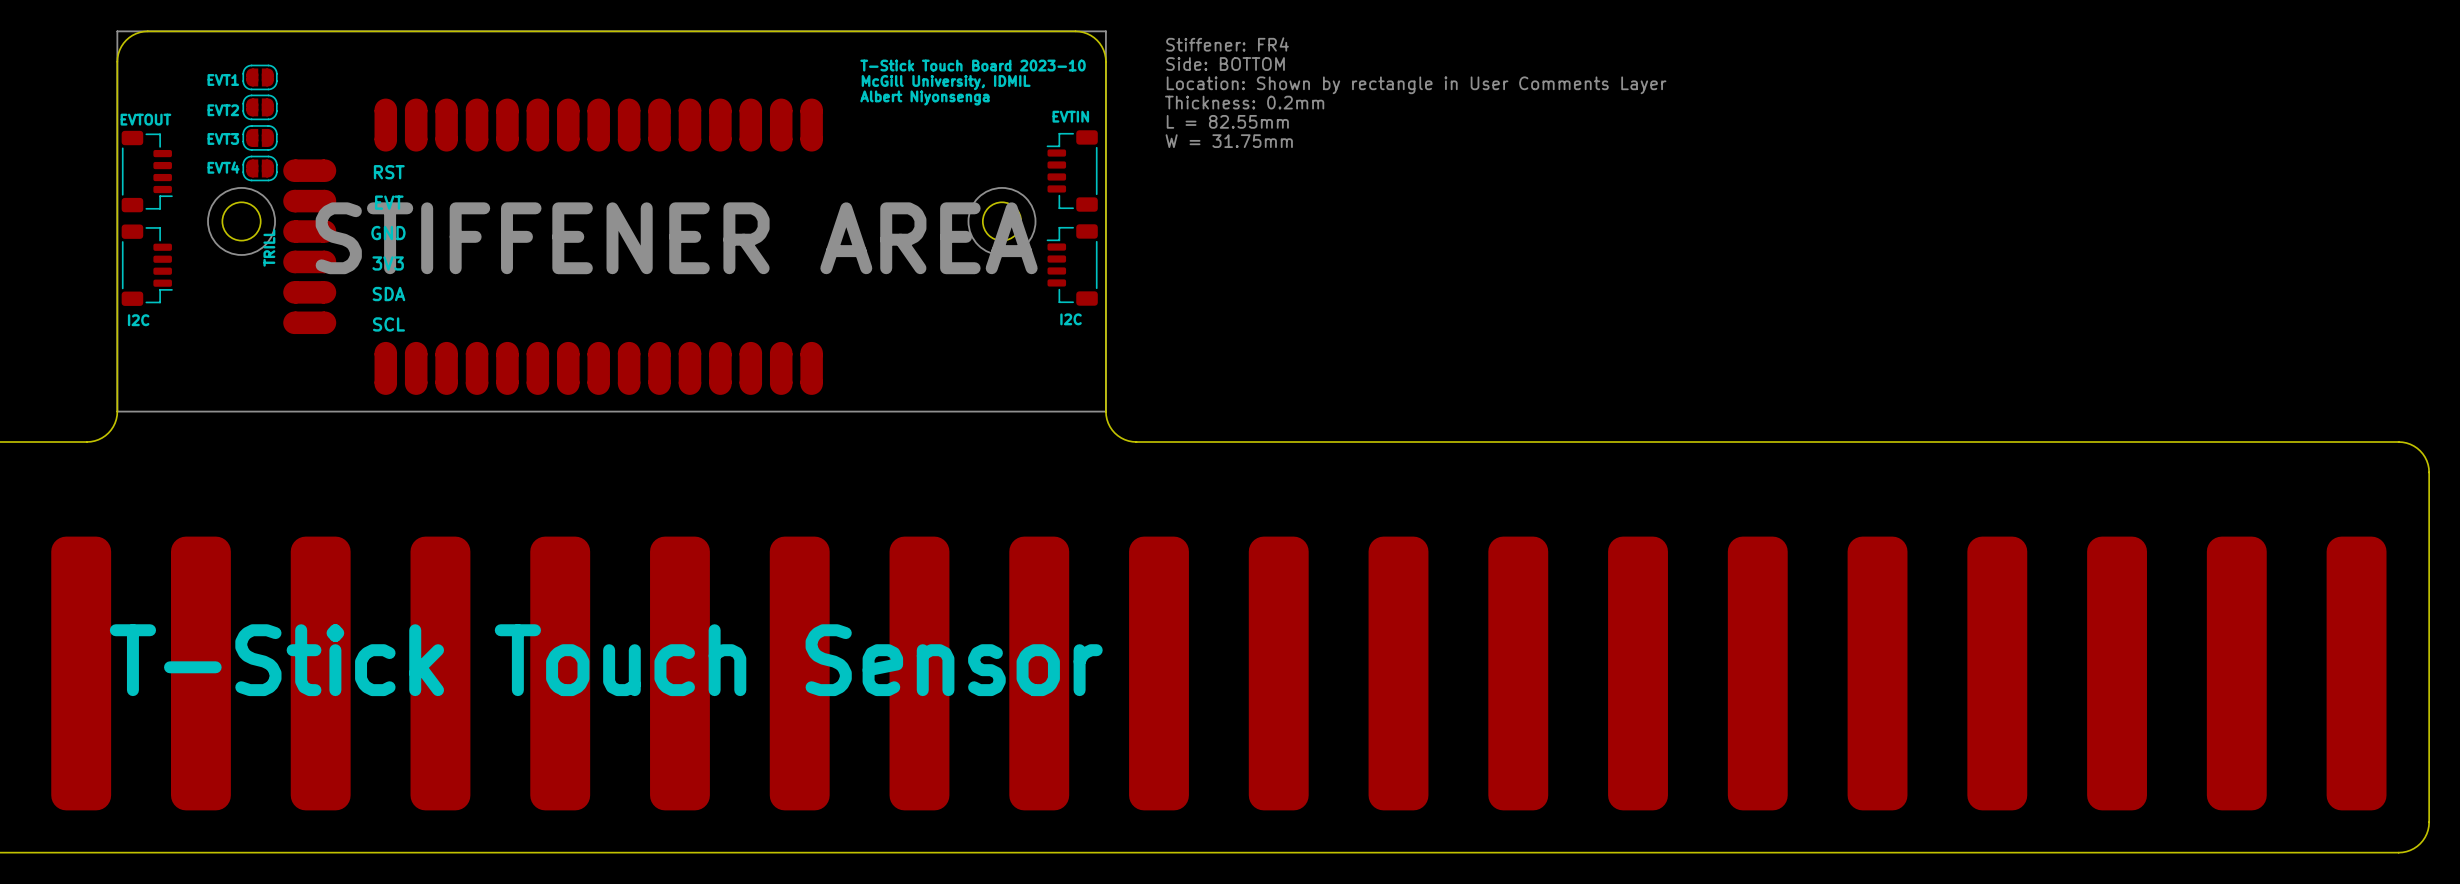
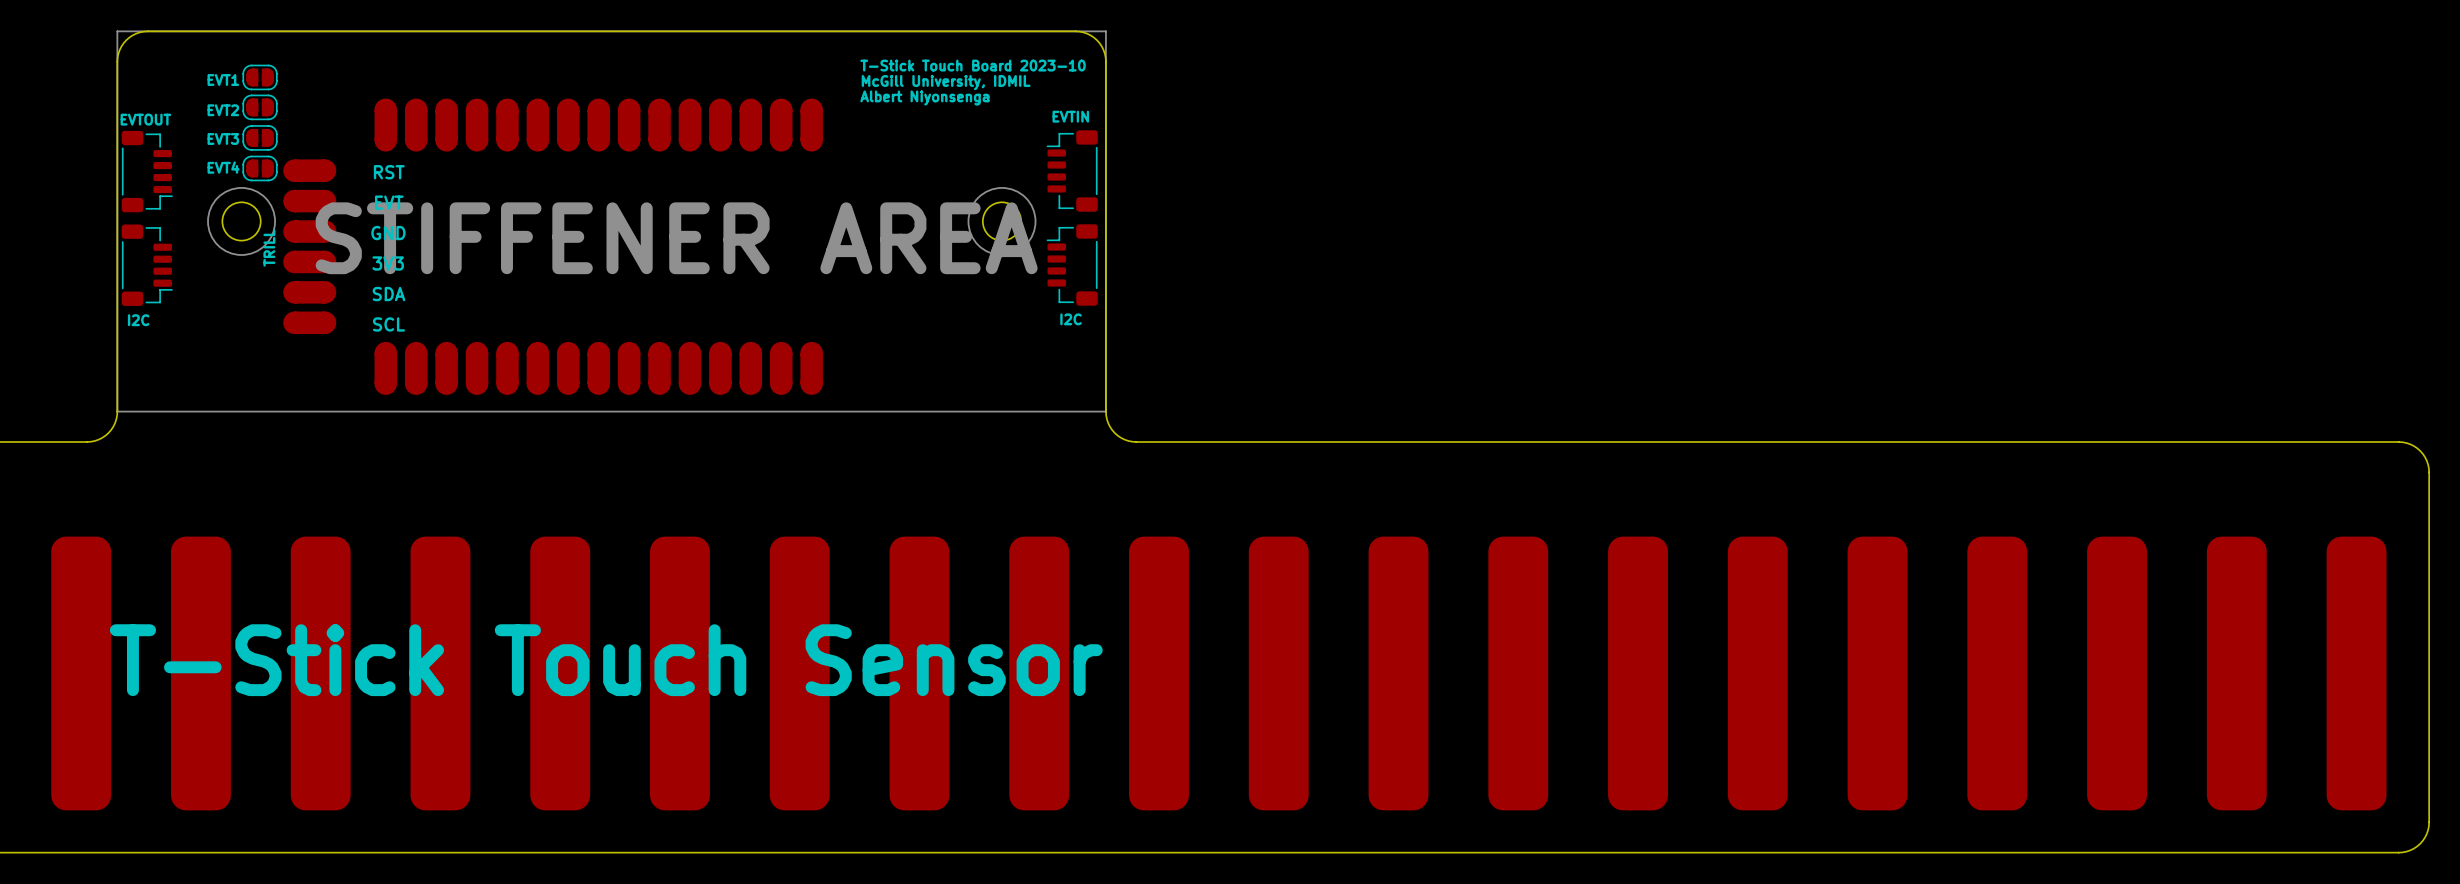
text: Stiffener: FR4 (1227, 44) -> none
text: Side: BOTTOM (1225, 64) -> none
text: Location: Shown by rectangle in User Comments Layer (1416, 85) -> none
text: Thickness: 0.2mm (1244, 102) -> none
text: L = 82.55mm (1227, 121) -> none
text: W = 31.75mm (1229, 141) -> none

